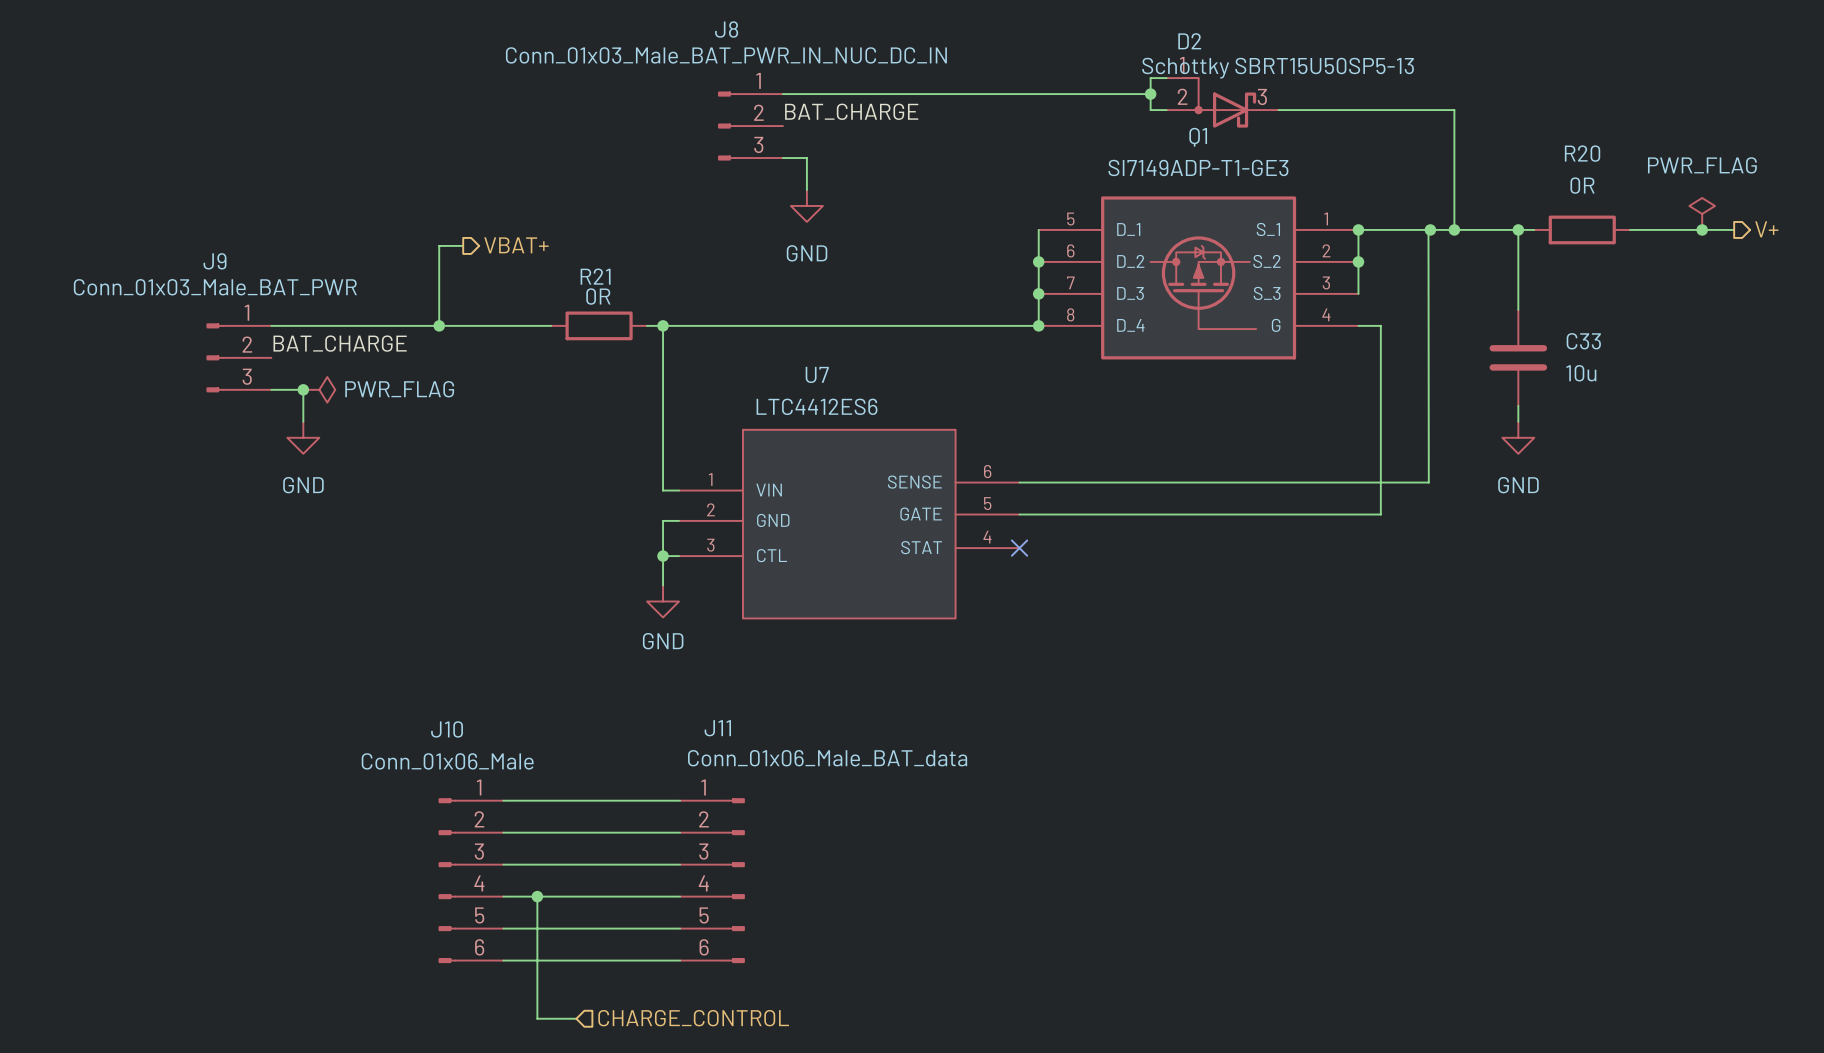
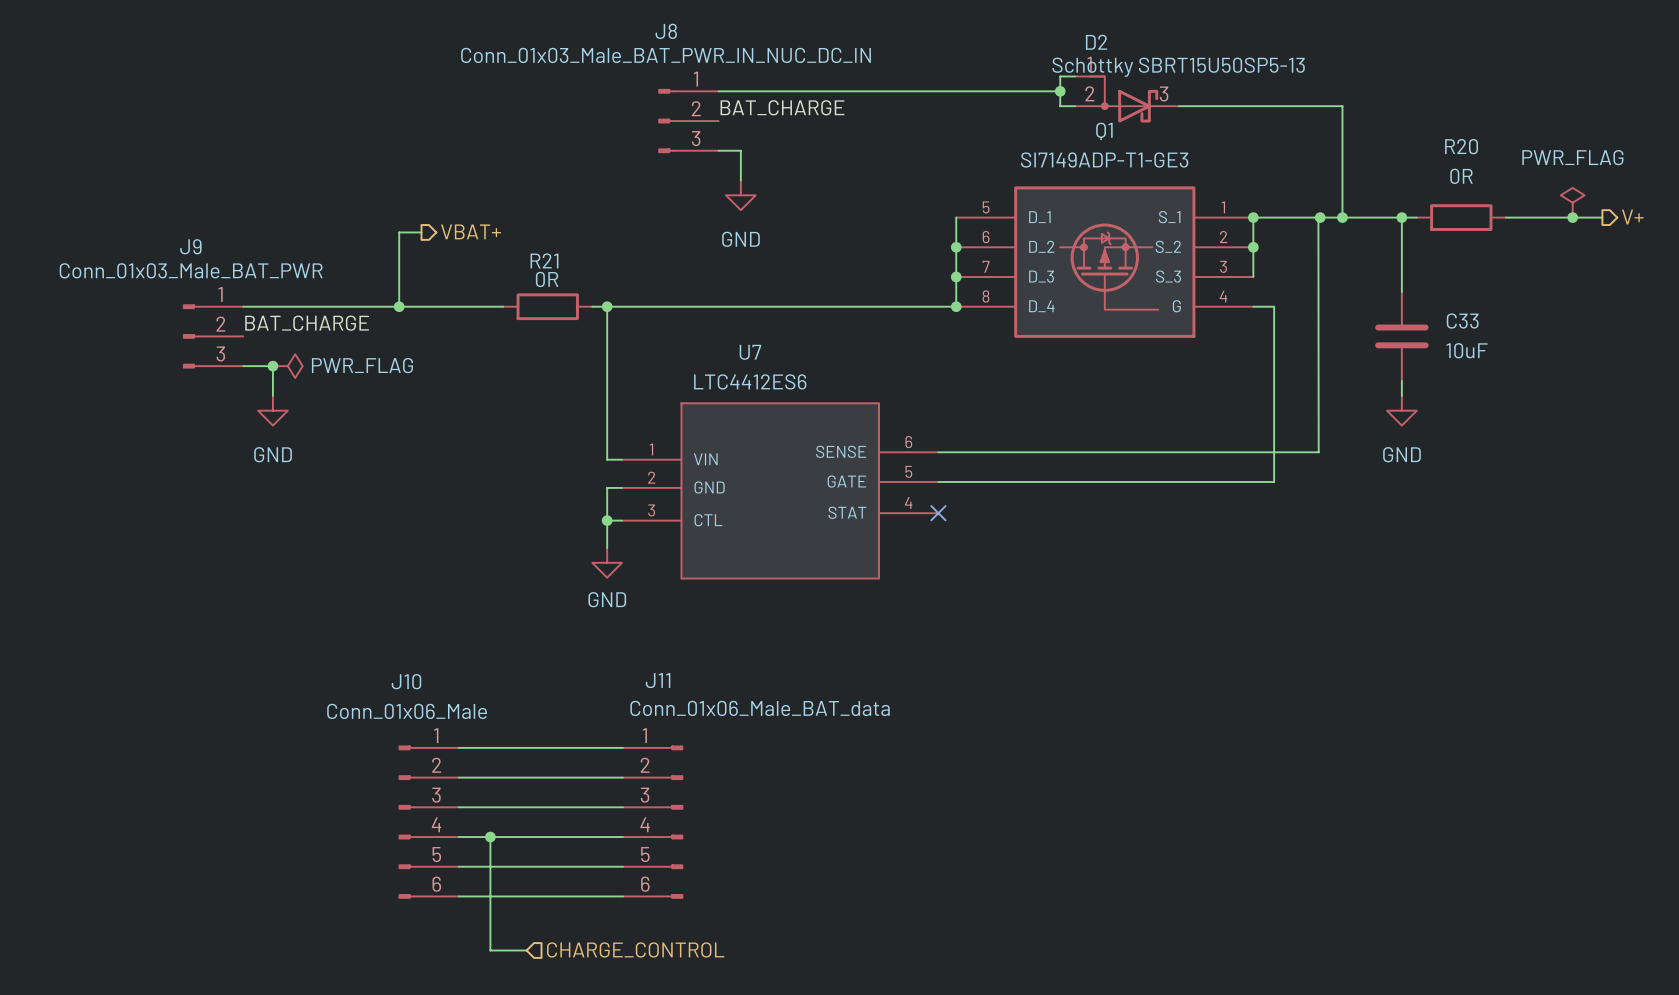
C33 value: 10u (1581, 373) -> 10uF (1467, 350)

